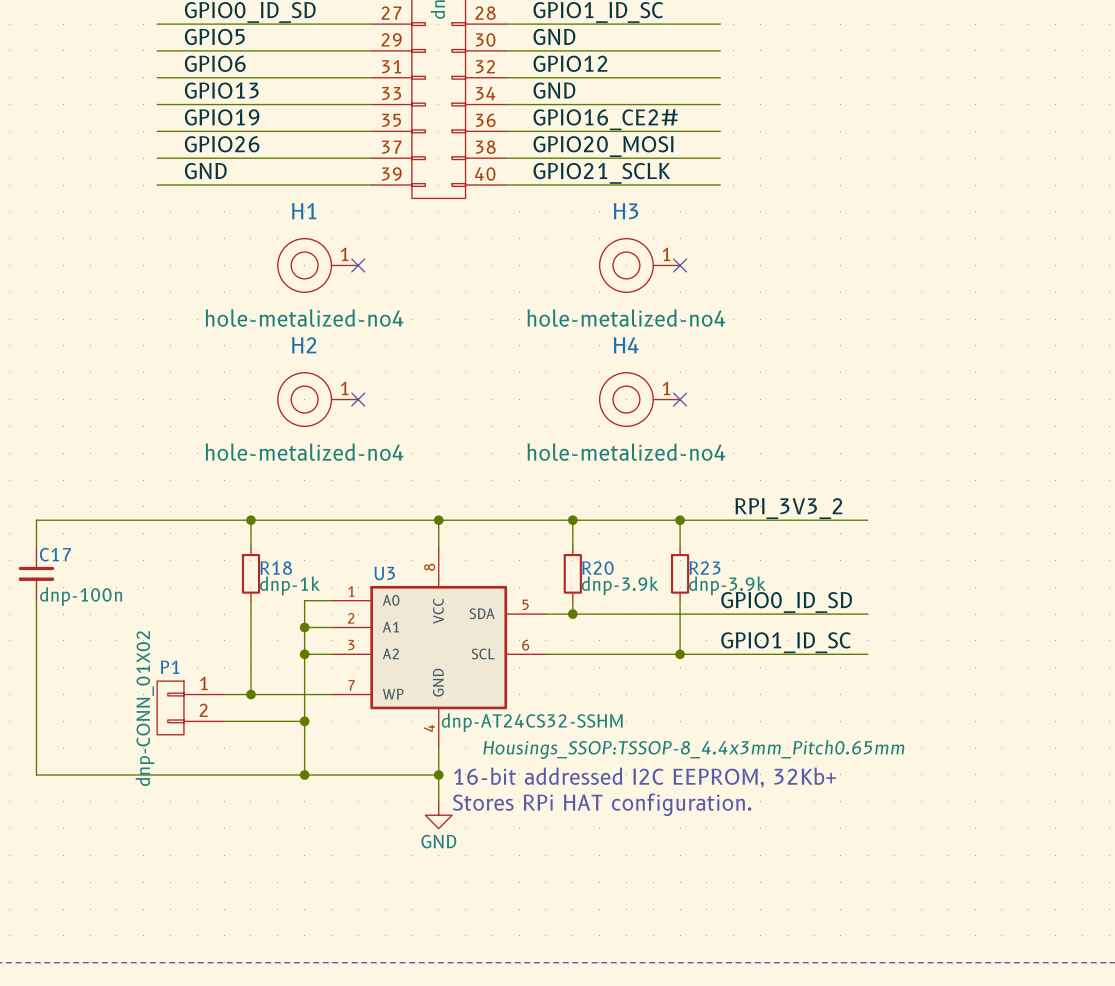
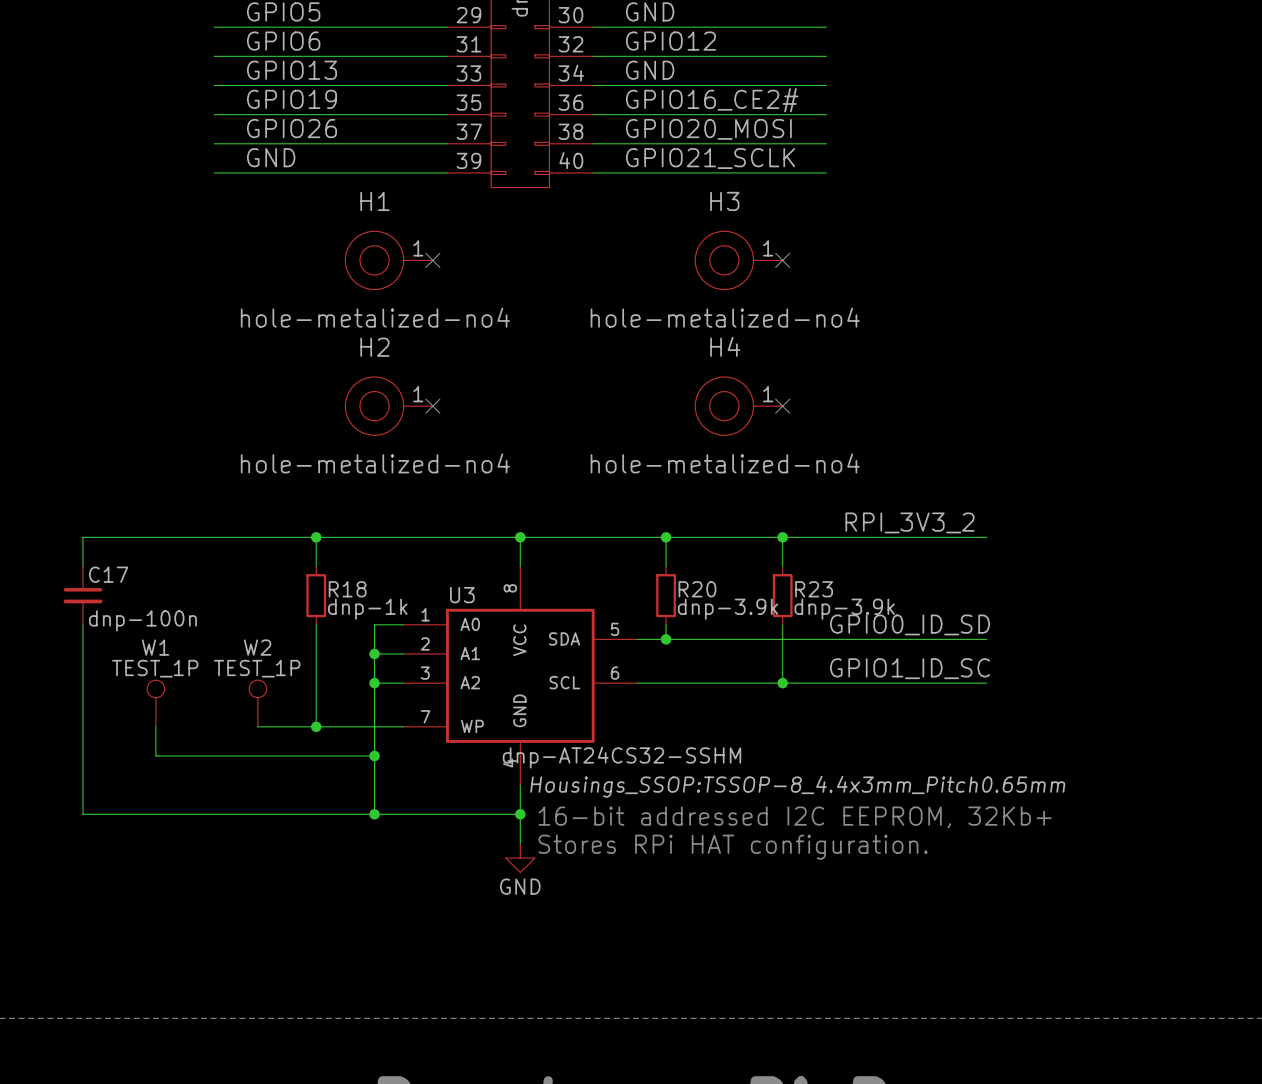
W1: none -> TEST_1P (155, 703)
W2: none -> TEST_1P (257, 703)
wire: none -> (155, 726) (155, 755) (287, 755)
P1: dnp-CONN_01X02 (190, 707) -> none

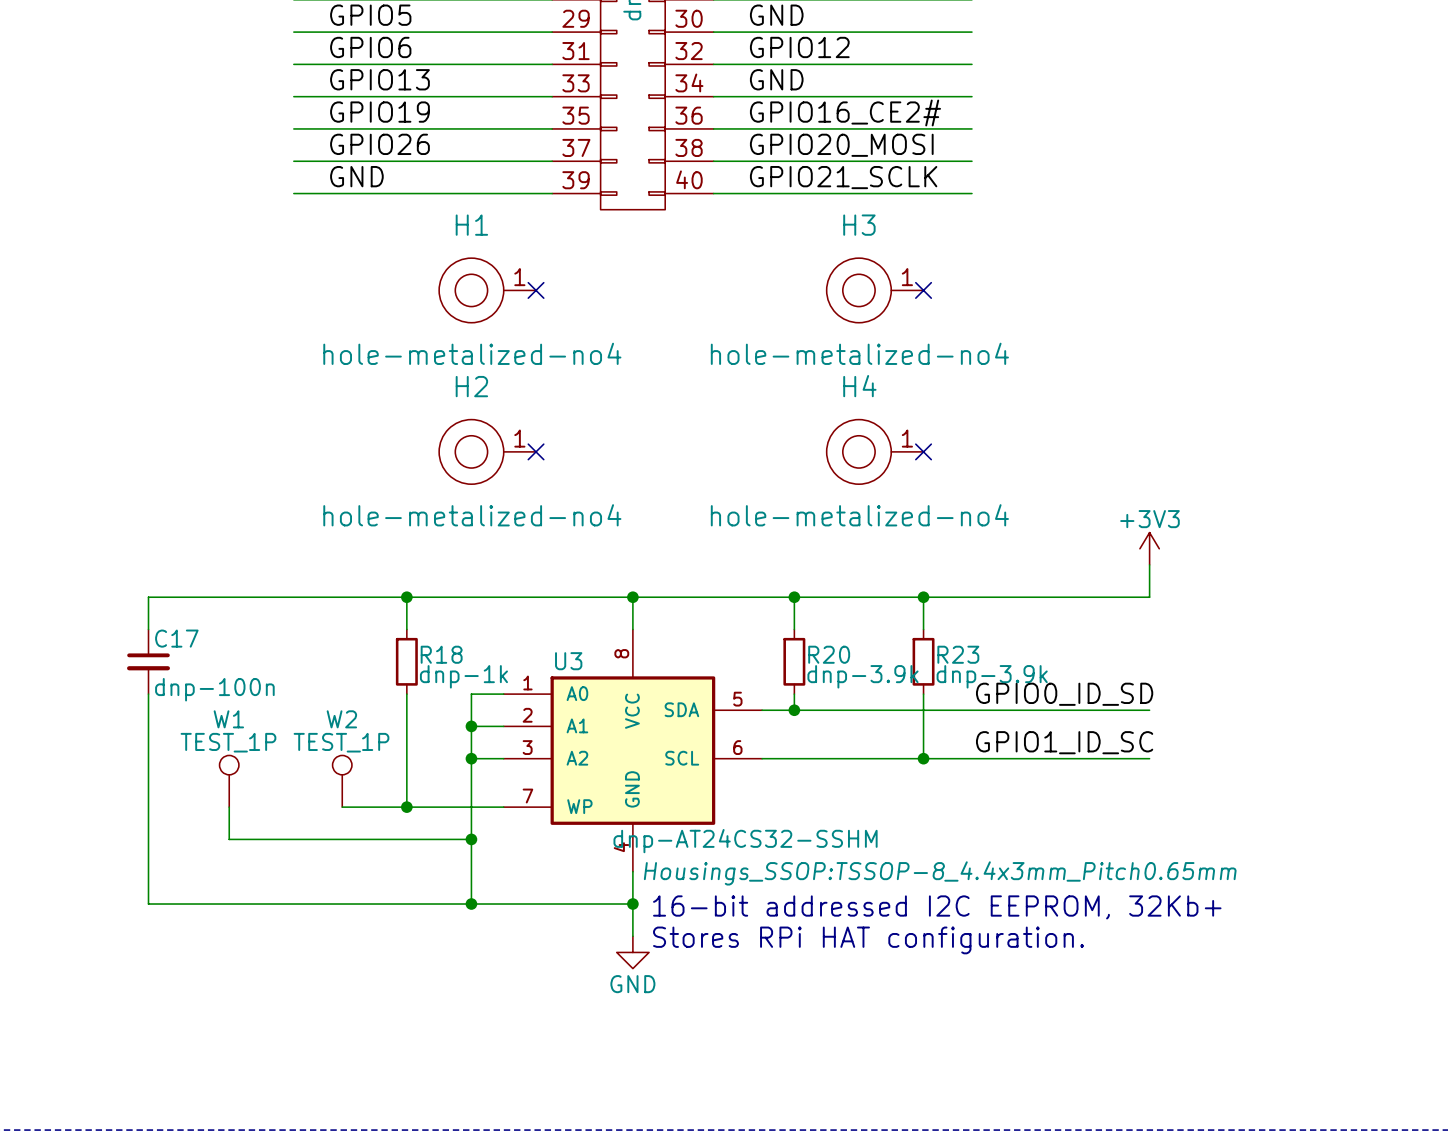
power symbol: none -> +3V3 (1149, 548)
wire: none -> (1149, 564) (1149, 597)
label: RPI_3V3_2 (910, 522) -> none

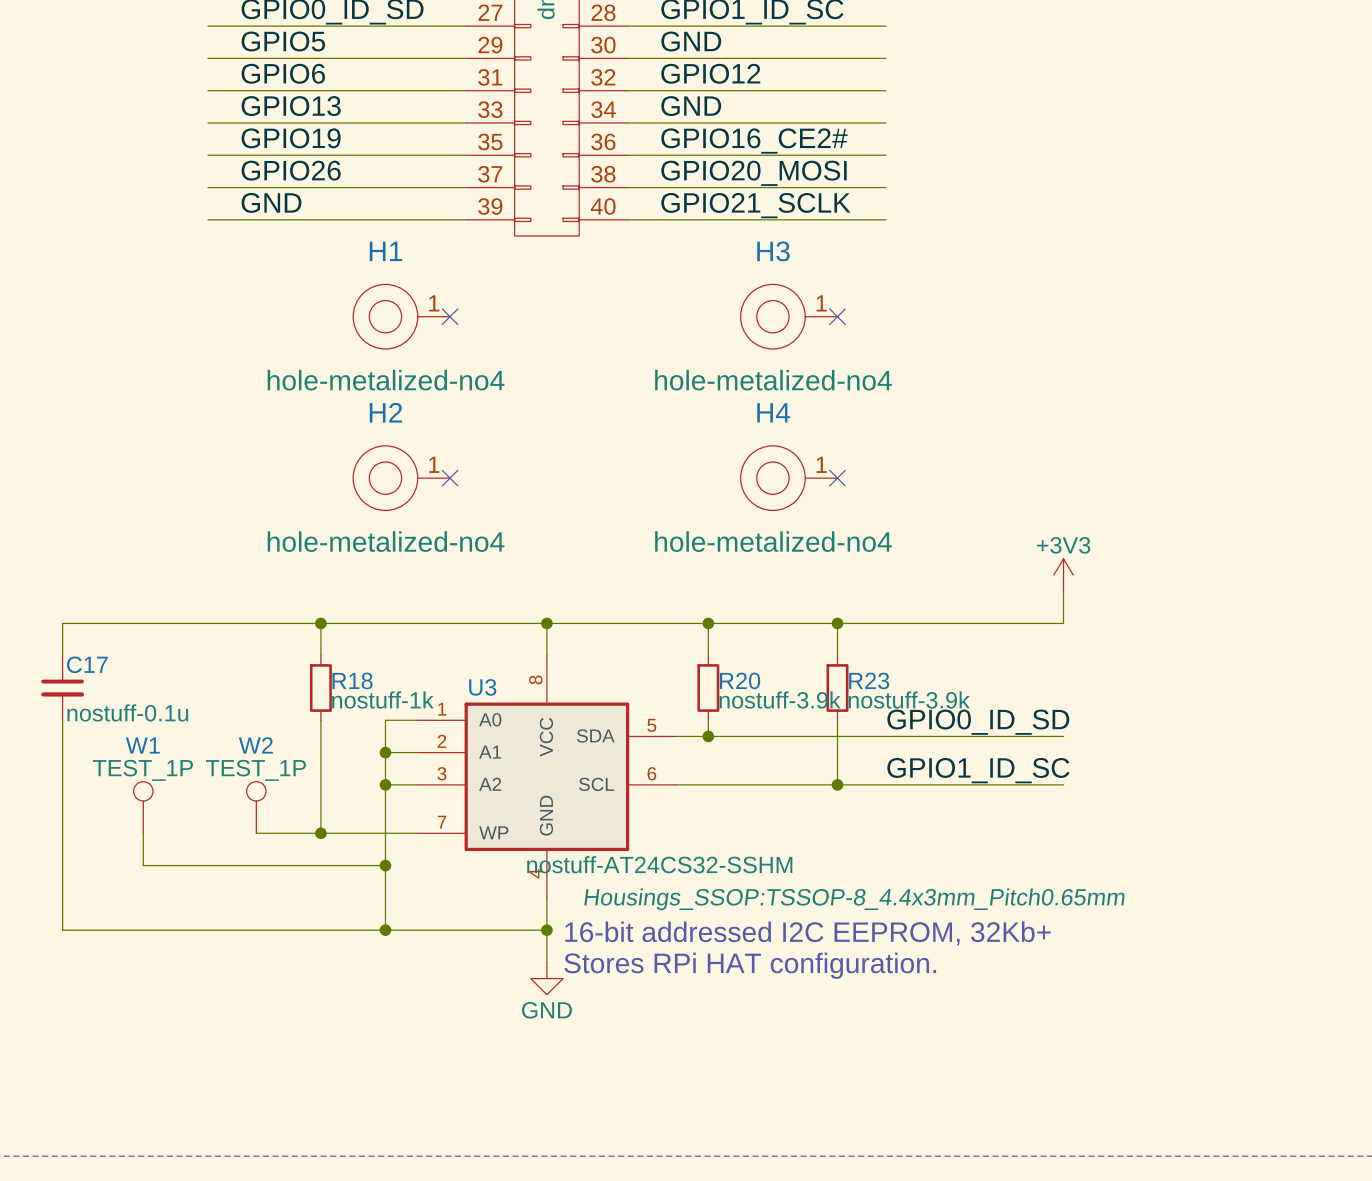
R18 value: dnp-1k (463, 676) -> nostuff-1k (382, 700)
R20 value: dnp-3.9k (863, 676) -> nostuff-3.9k (780, 700)
R23 value: dnp-3.9k (992, 676) -> nostuff-3.9k (909, 700)
C17 value: dnp-100n (214, 689) -> nostuff-0.1u (127, 712)
U3 value: dnp-AT24CS32-SSHM (745, 841) -> nostuff-AT24CS32-SSHM (659, 864)

